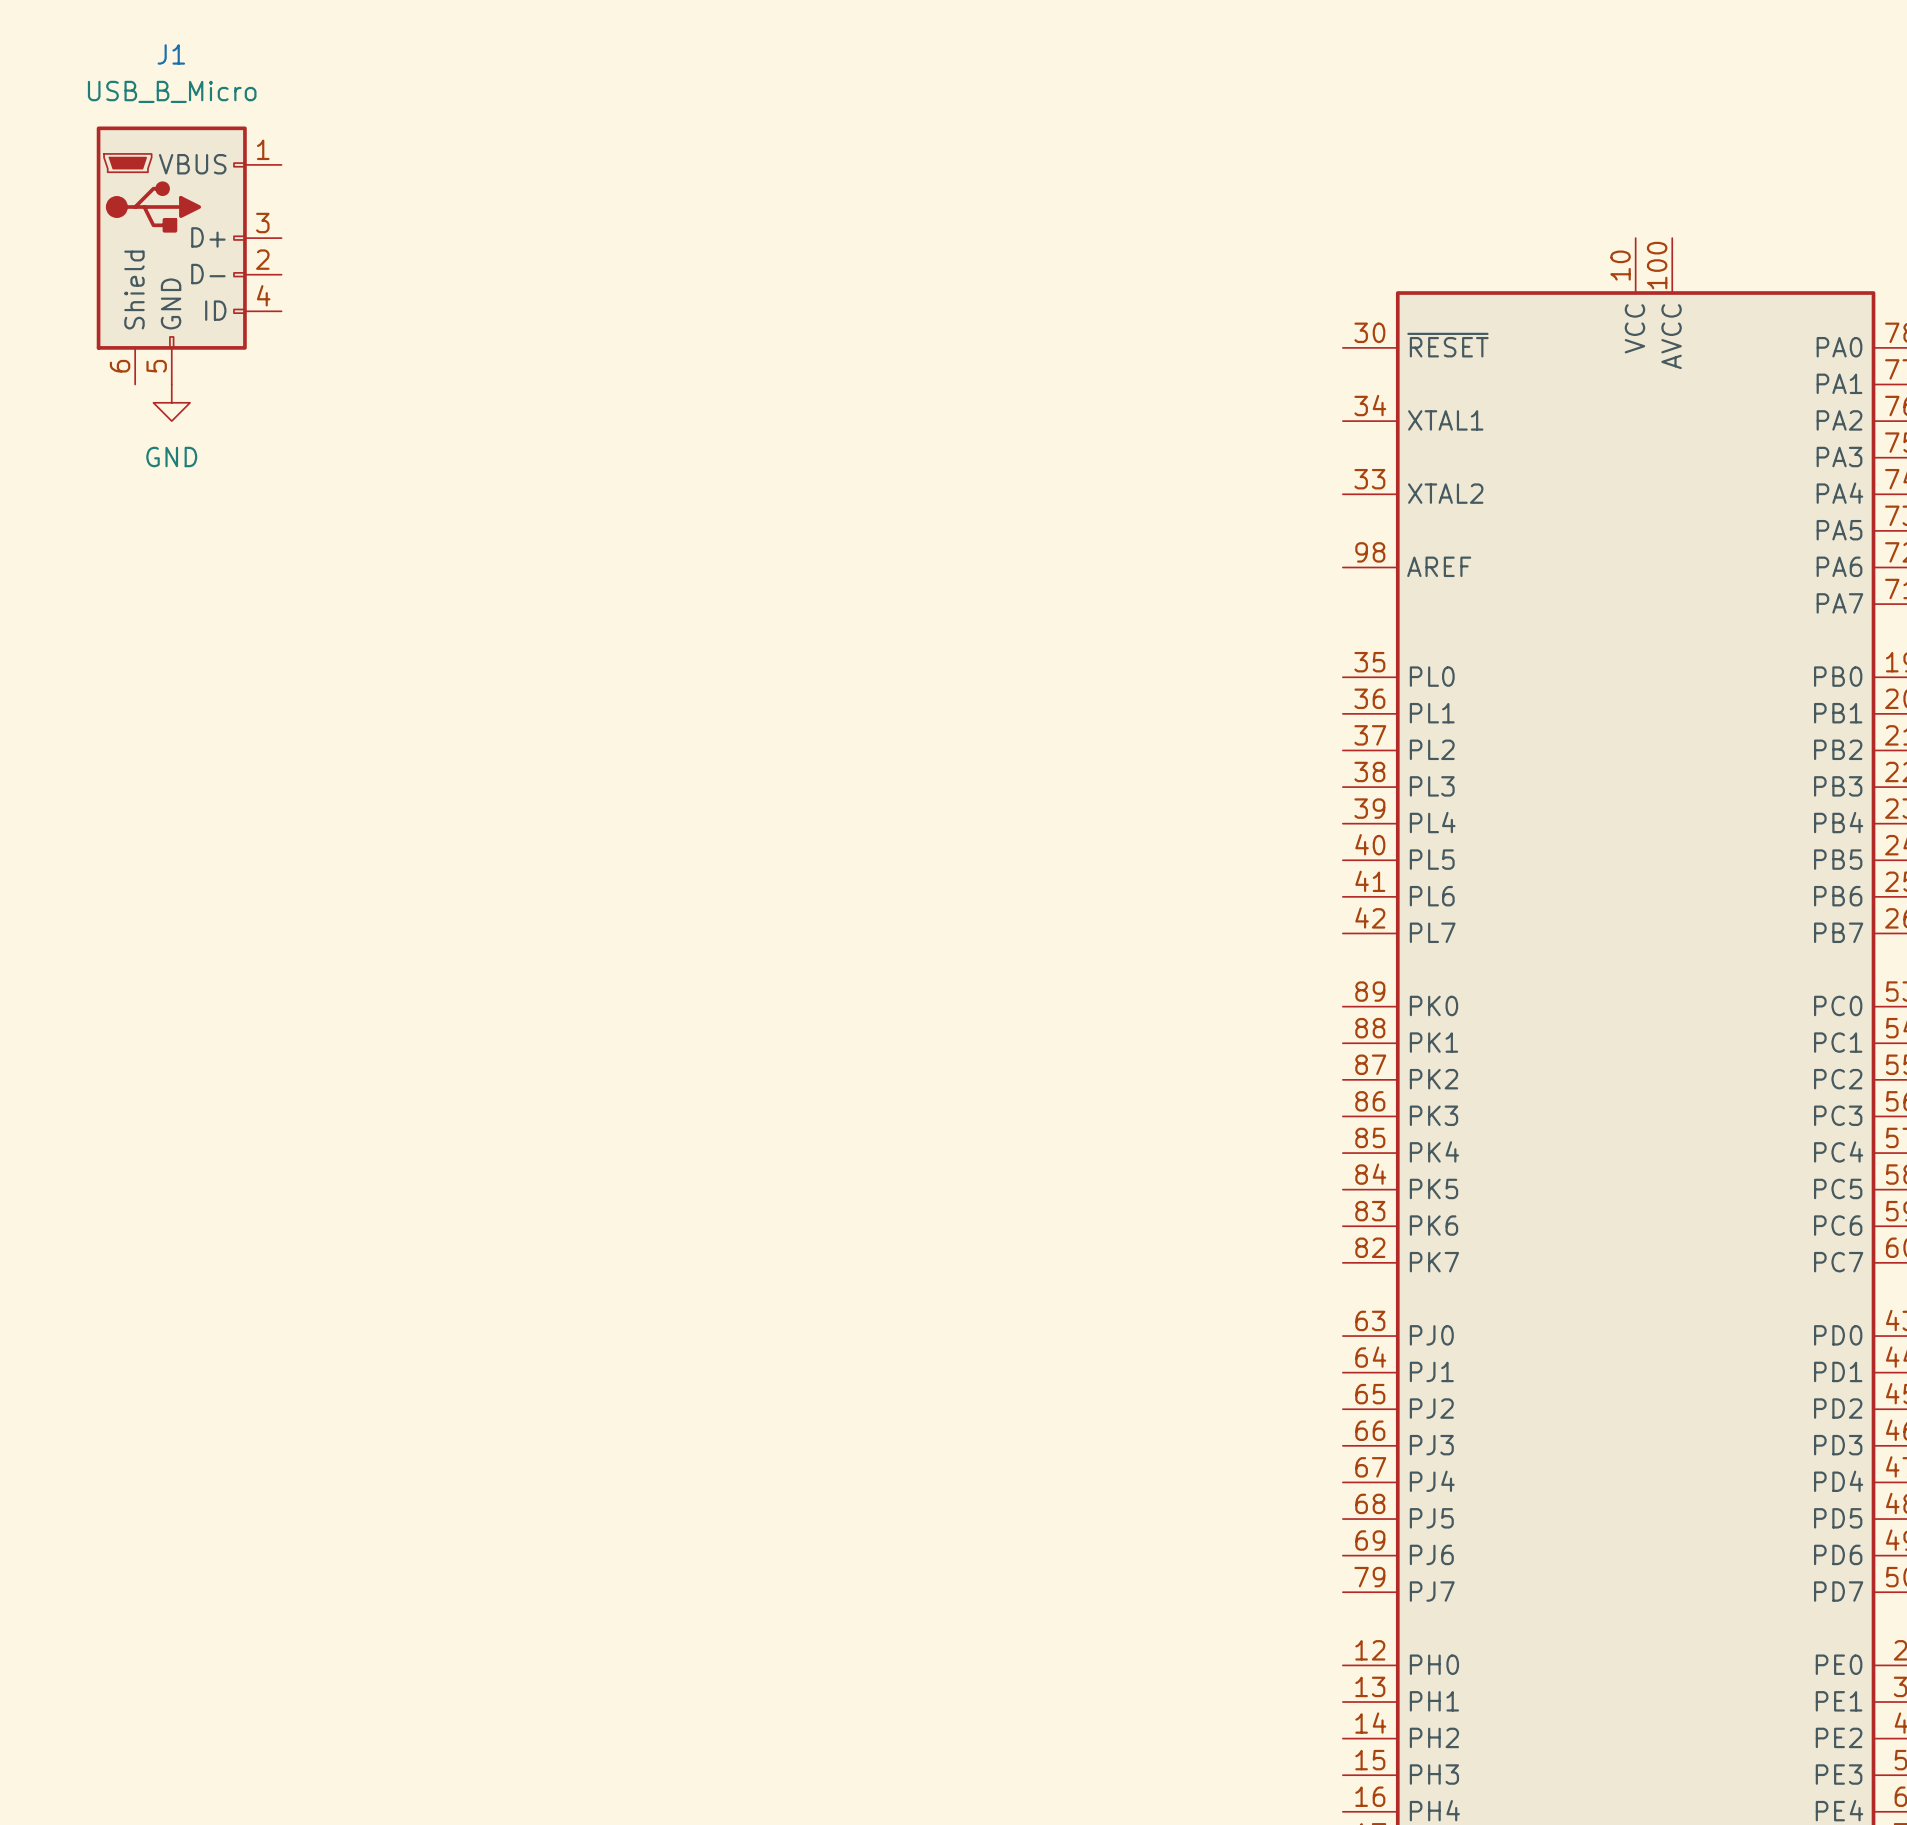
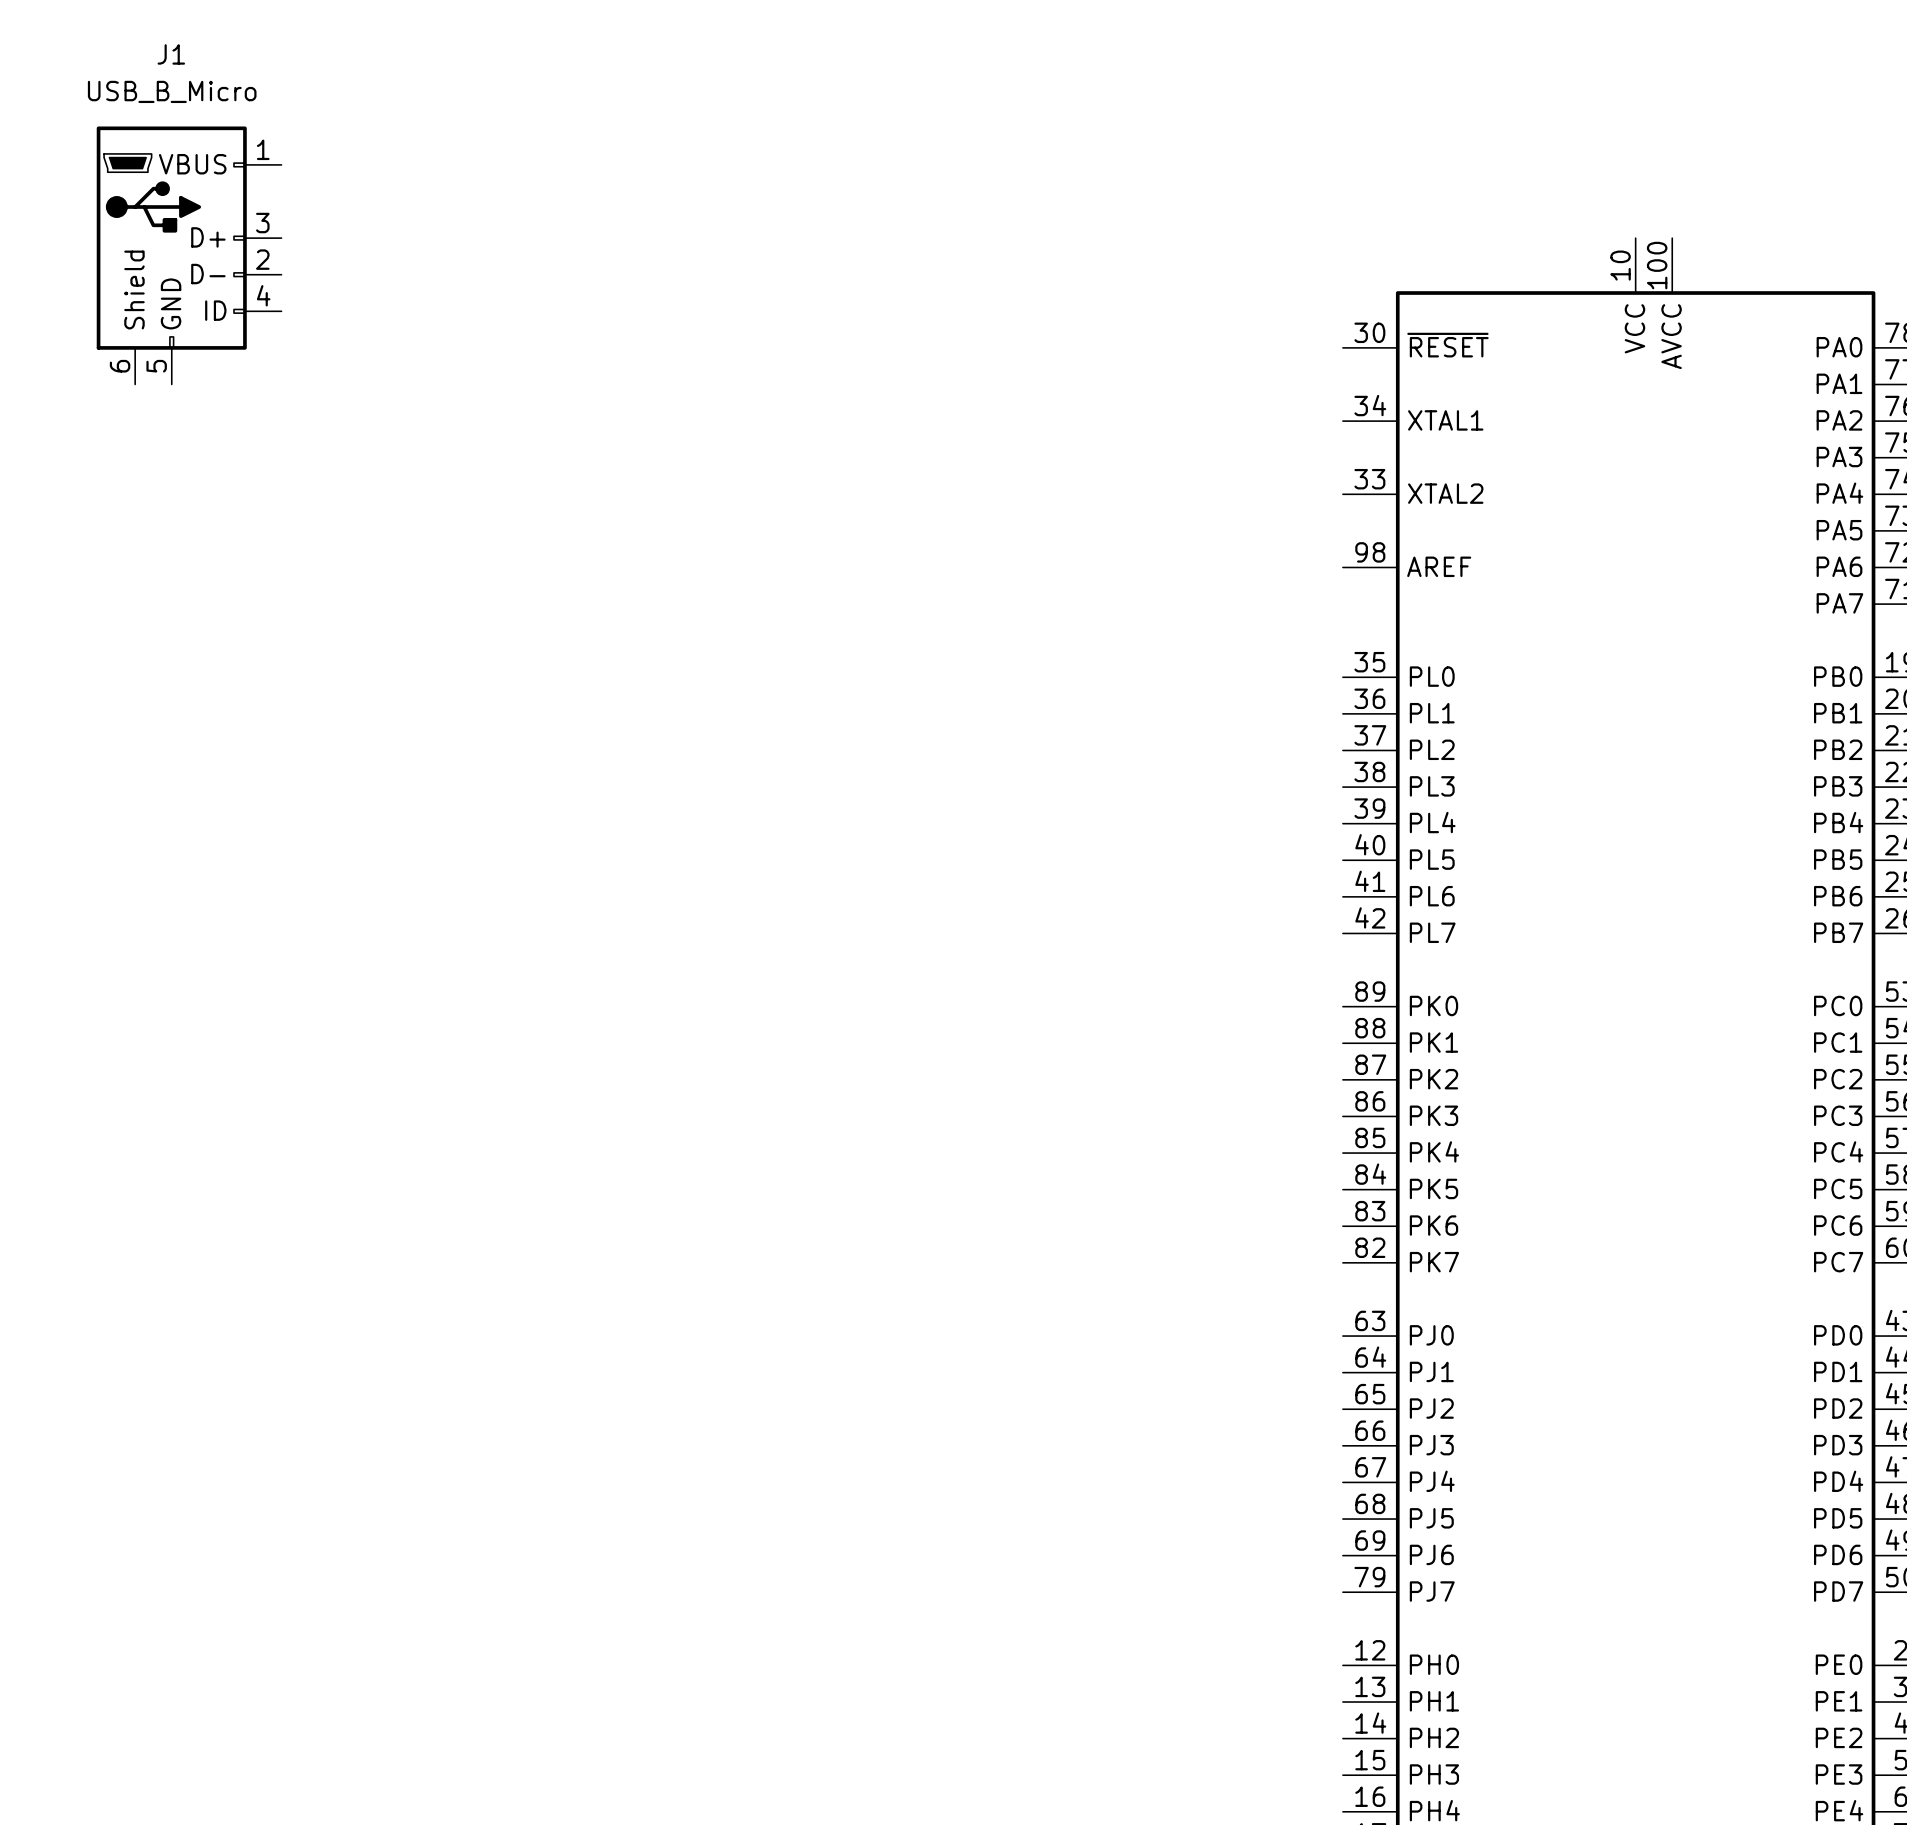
power symbol: GND (171, 402) -> none

